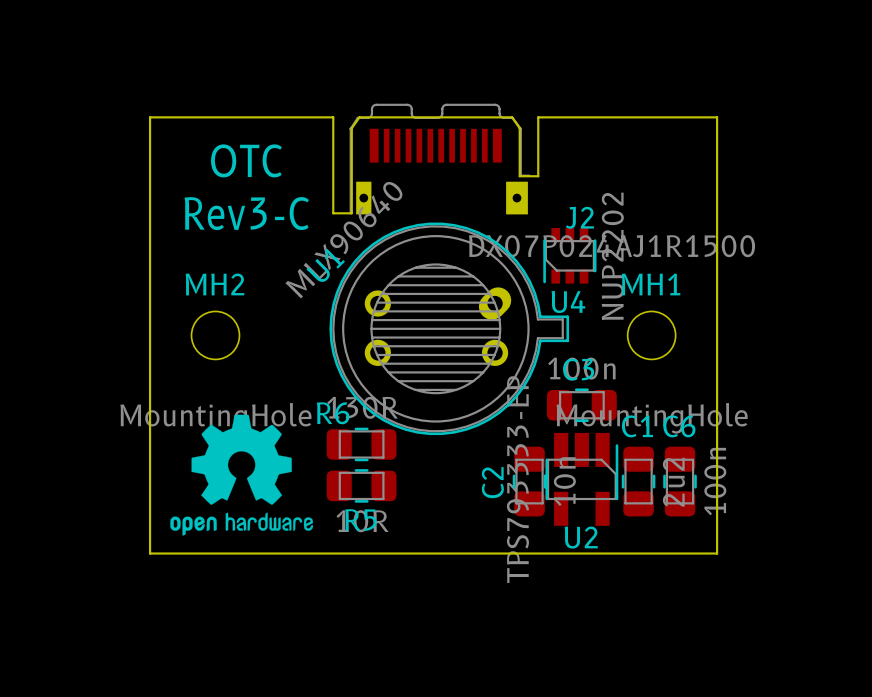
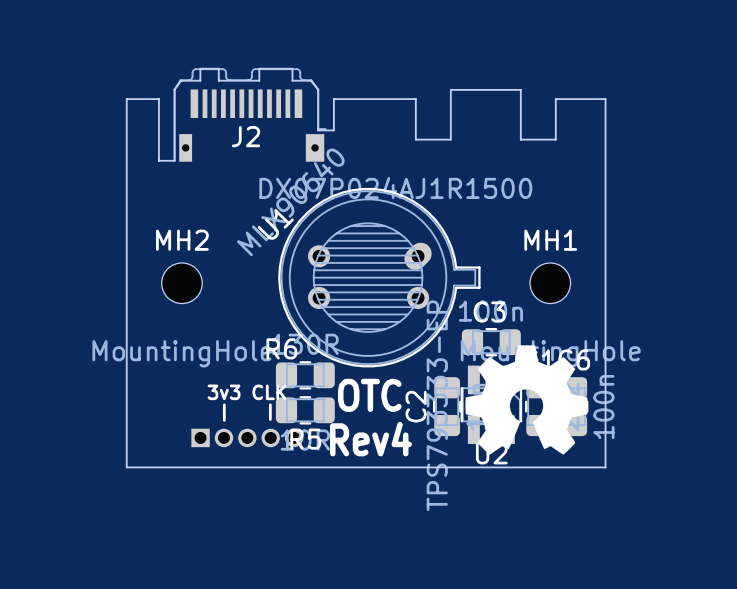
board edge: (188, 117) (333, 117) (333, 213) (351, 213) (351, 128) (359, 117) (395, 117) -> (158, 99) (158, 160) (174, 160) (174, 89) (181, 80) (200, 80) (200, 68) (218, 68) (218, 80) (259, 80) (259, 68) (292, 68) (292, 80) (310, 80) (318, 89) (318, 130) (333, 130) (333, 99)
board edge: (492, 117) (512, 117) (519, 128) (519, 176) (538, 176) (538, 117) (658, 117) -> (415, 99) (415, 139) (450, 139) (450, 89) (520, 89) (520, 139) (555, 139) (555, 99)
J2 position: (440, 159) -> (250, 114)
text position: OTC (246, 160) -> OTC (369, 395)
text: Rev3-C (246, 213) -> none
J2 name position: J2 (579, 217) -> J2 (245, 136)
U4: NUP2202 (569, 255) -> none
drawing: none -> [465, 345, 588, 455]
drawing: [170, 414, 313, 536] -> none
text: none -> 3v3 CLK (247, 392)
line: none -> (224, 404) (224, 420)
line: none -> (270, 404) (270, 419)
part: none -> (247, 437)
text: none -> Rev4 (370, 439)

